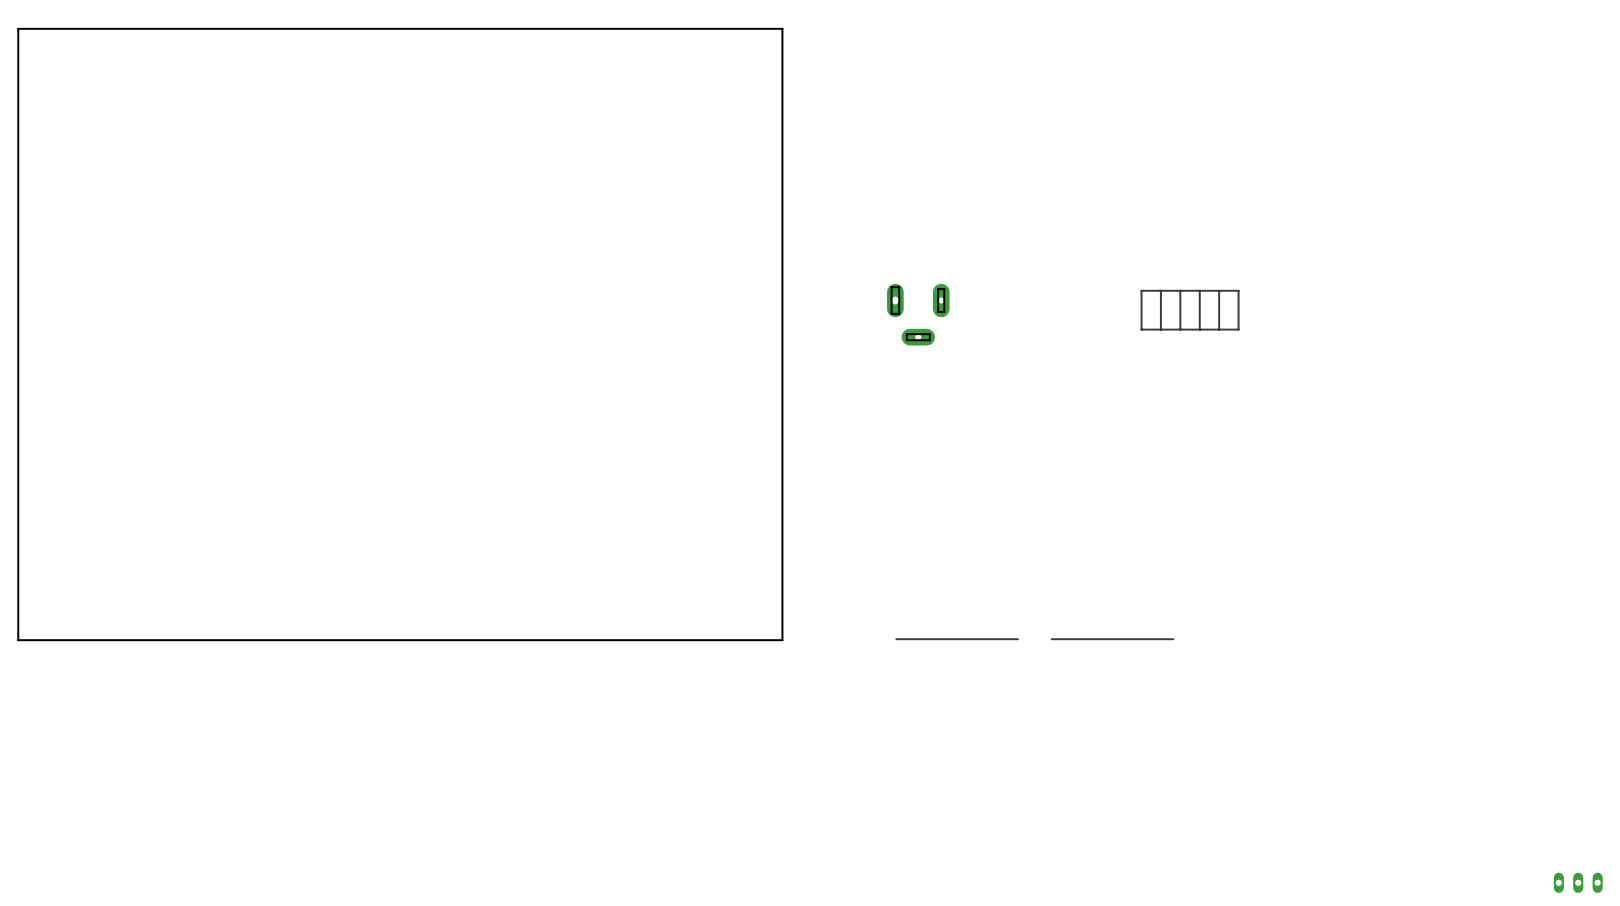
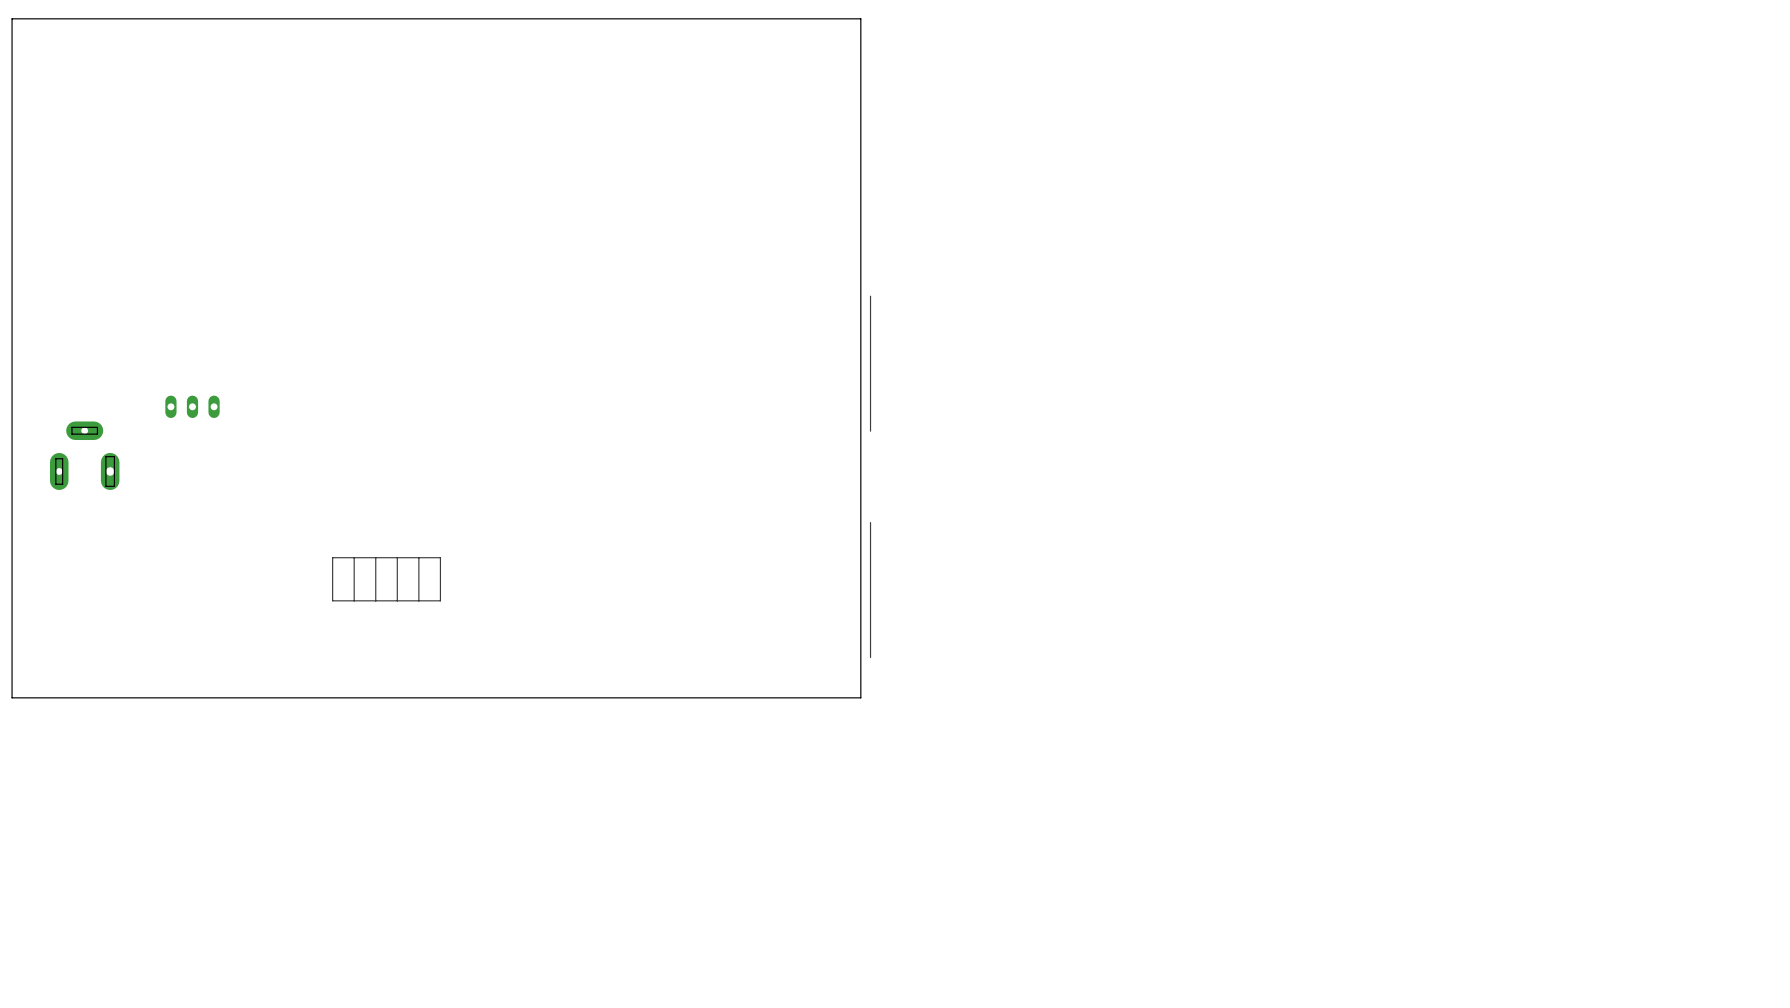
part: (1190, 310) -> none
part: (918, 314) -> none
part: none -> (870, 363)
part: none -> (192, 406)
part: none -> (84, 455)
part: none -> (386, 579)
part: none -> (870, 590)
part: (957, 639) -> none
part: (1112, 639) -> none
part: (1578, 882) -> none

